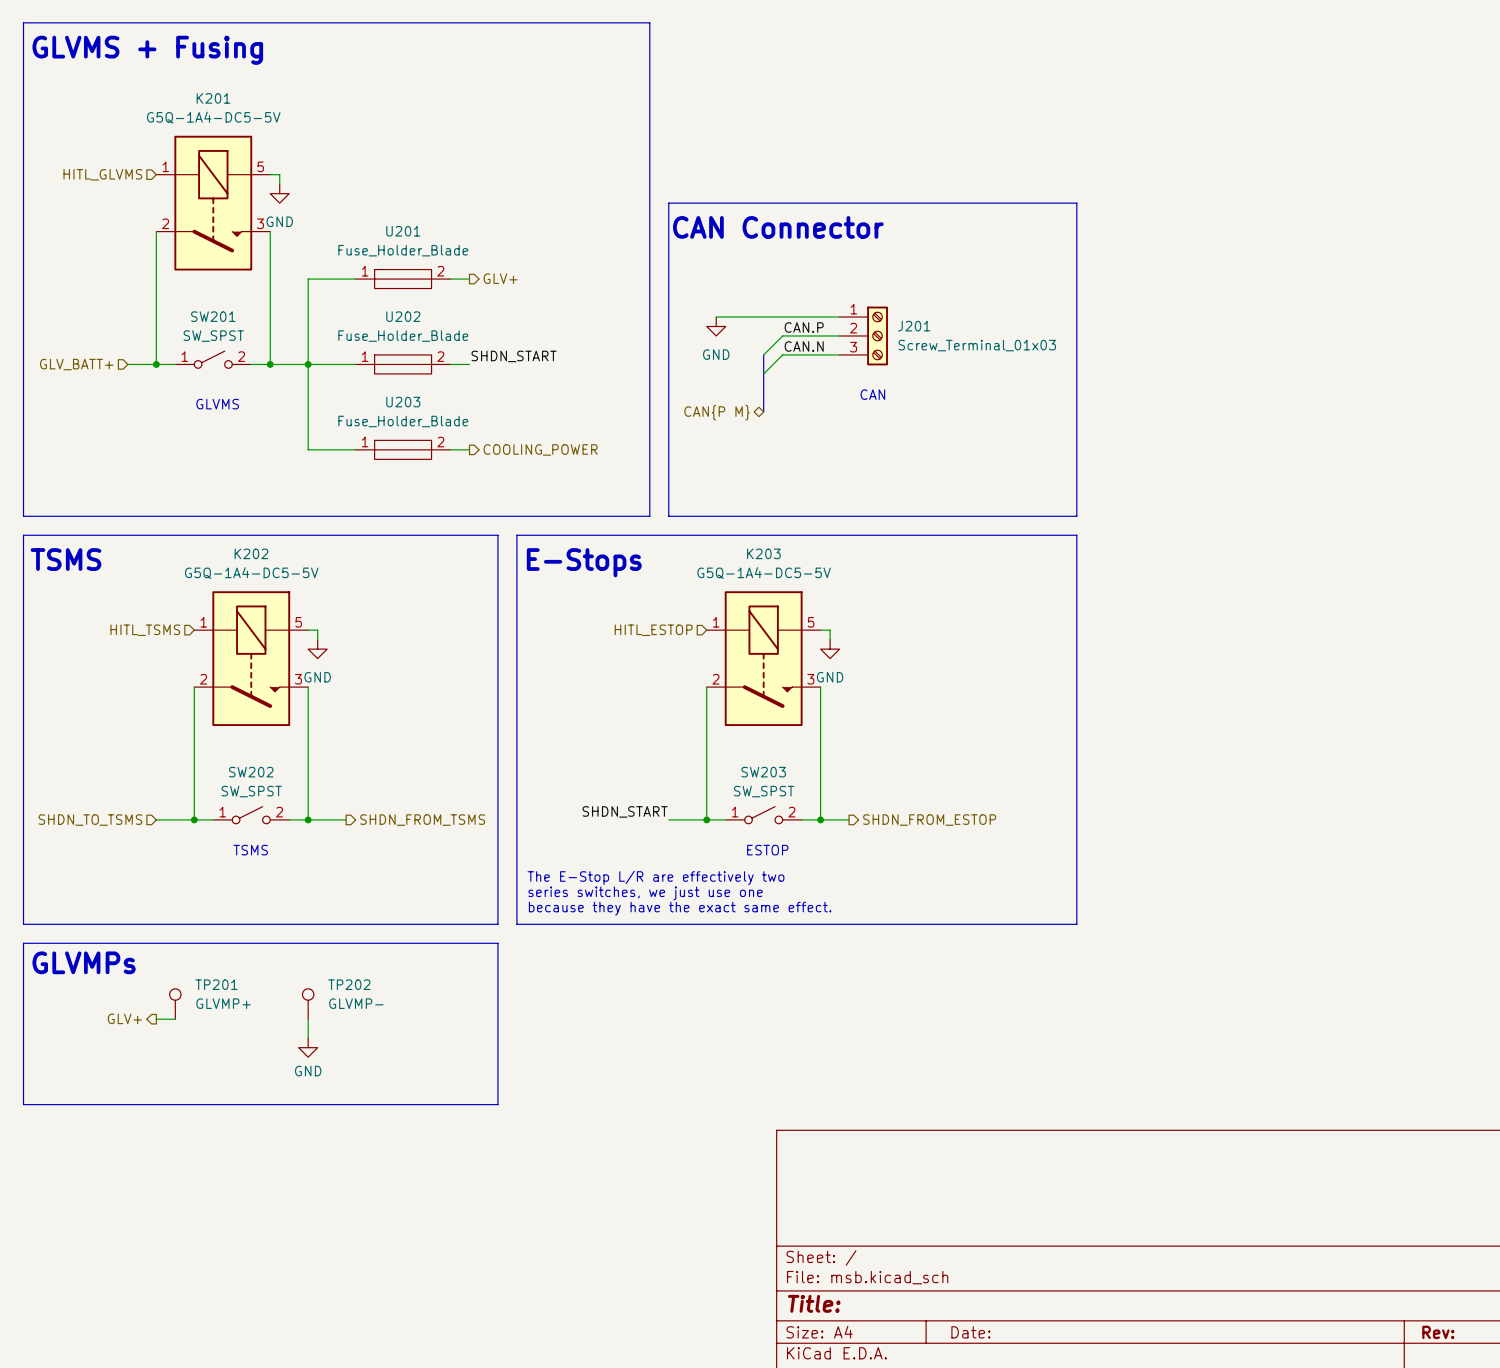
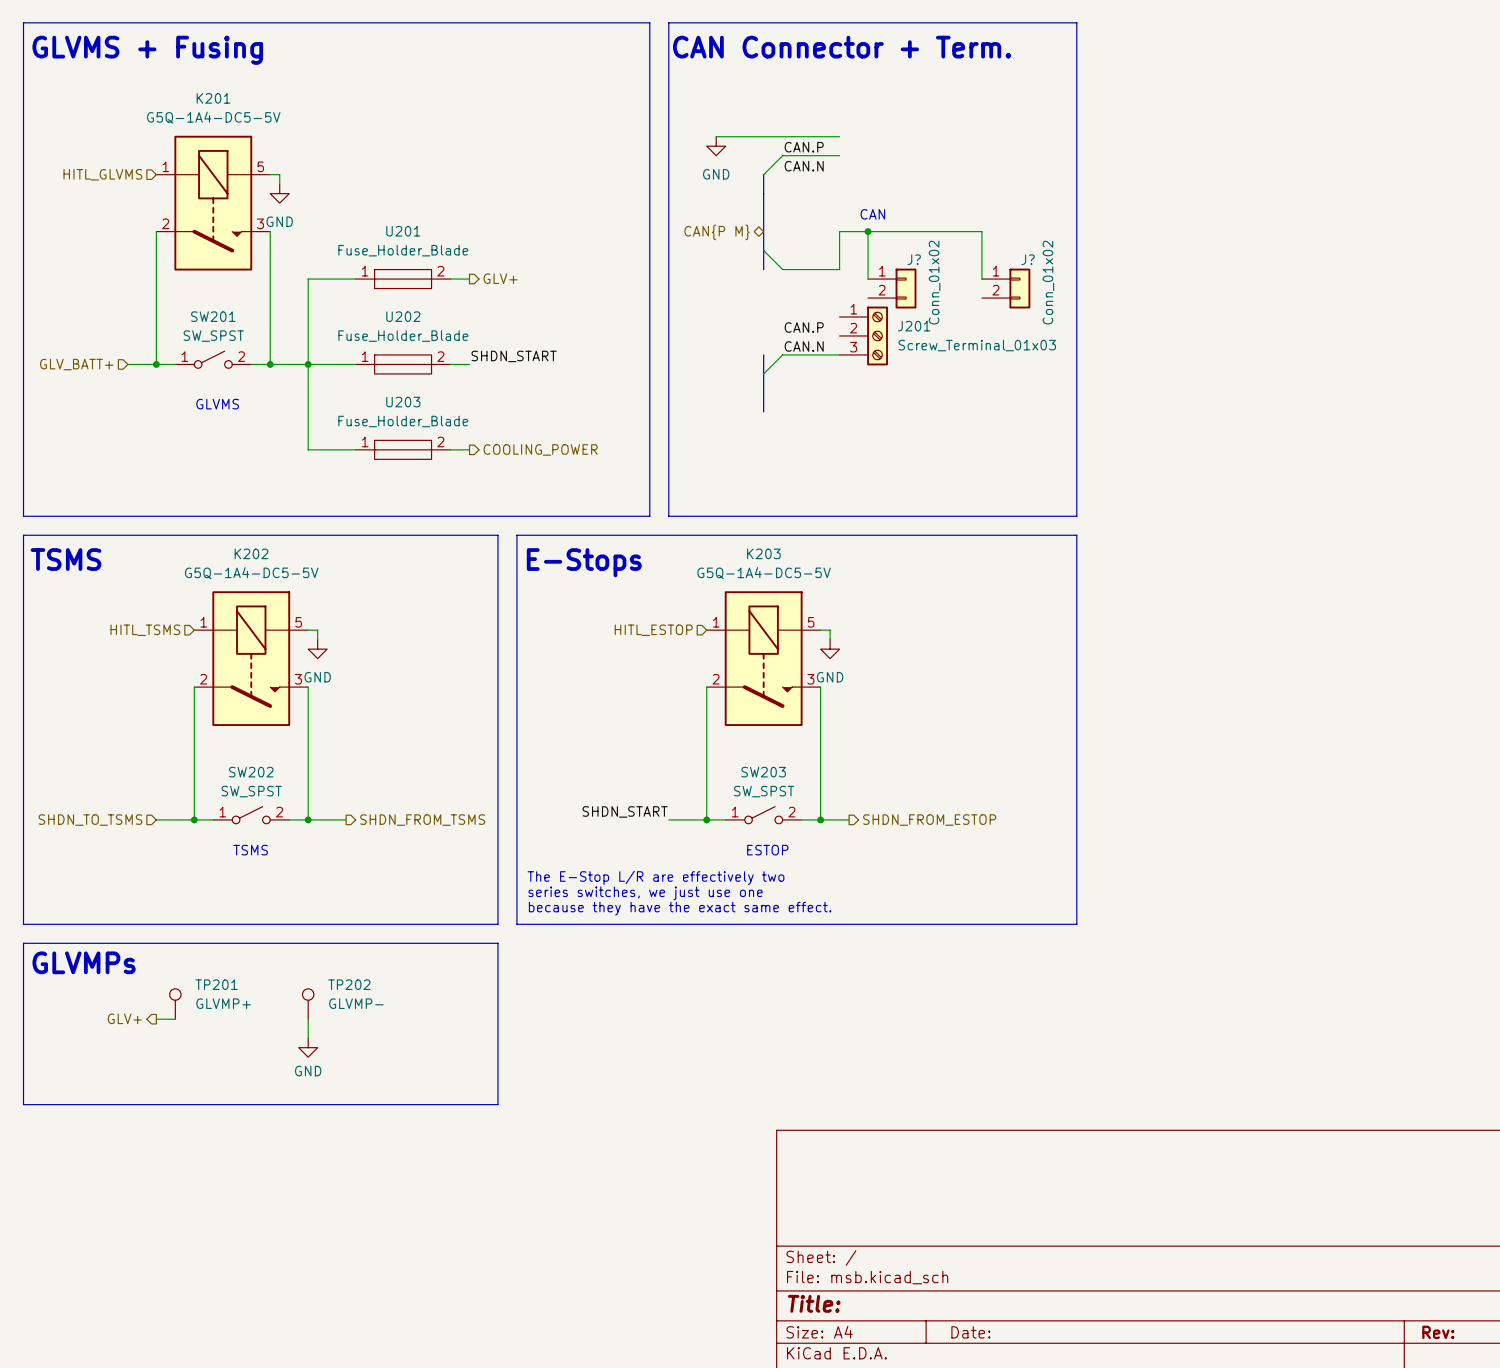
text: none -> CAN Connector + Term. (842, 47)
label: none -> CAN.P (804, 147)
label: none -> CAN.N (804, 166)
bus: none -> (763, 174) (763, 269)
line: (668, 203) (1076, 203) -> (668, 203) (668, 22) (1076, 22) (1076, 203)
text: CAN Connector (778, 227) -> none
wire: none -> (868, 231) (868, 279)
junction: none -> (868, 231)
wire: none -> (763, 250) (782, 269) (839, 269) (839, 231) (981, 231) (981, 279)
J?: none -> Conn_01x02 (892, 288)
J?: none -> Conn_01x02 (1006, 288)
wire: (716, 317) (839, 317) -> (716, 136) (839, 136)
power symbol position: GND (716, 326) -> GND (716, 146)
wire: (839, 335) (782, 335) (763, 354) -> (839, 155) (782, 155) (763, 174)
text position: CAN (872, 394) -> CAN (872, 214)
hierarchical label position: CAN{P M} (716, 412) -> CAN{P M} (716, 232)

